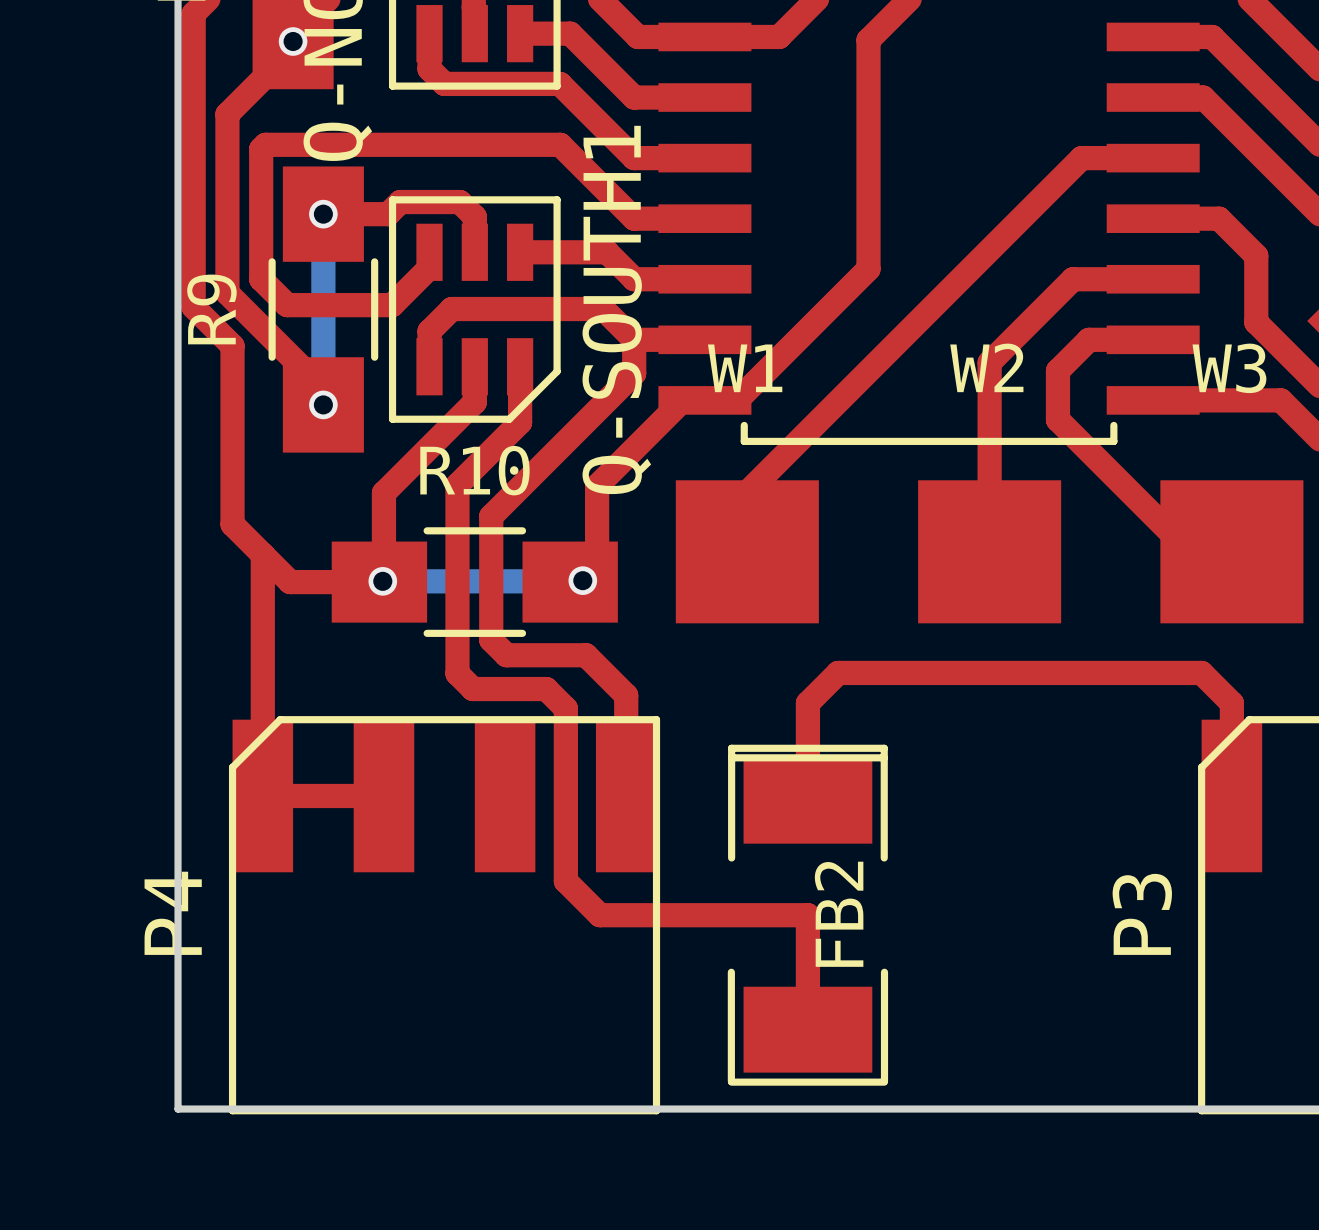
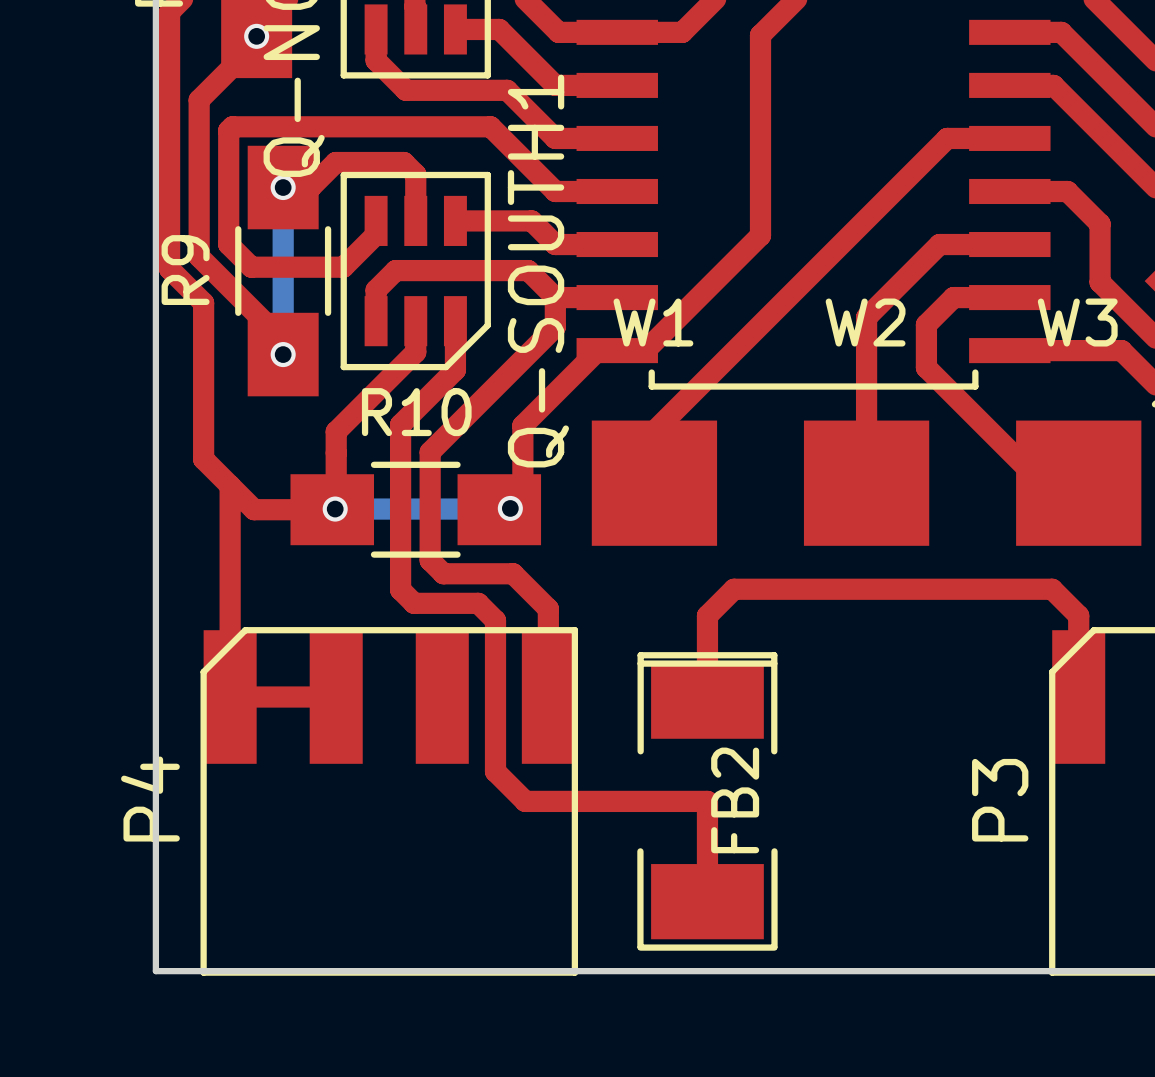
top track: (444, 83) (559, 83) (579, 103) -> (389, 73) (405, 90) (507, 90)
top track: (354, 214) (388, 214) (400, 202) (459, 202) (474, 216) -> (310, 187) (335, 162) (403, 162) (415, 174) (415, 189)

